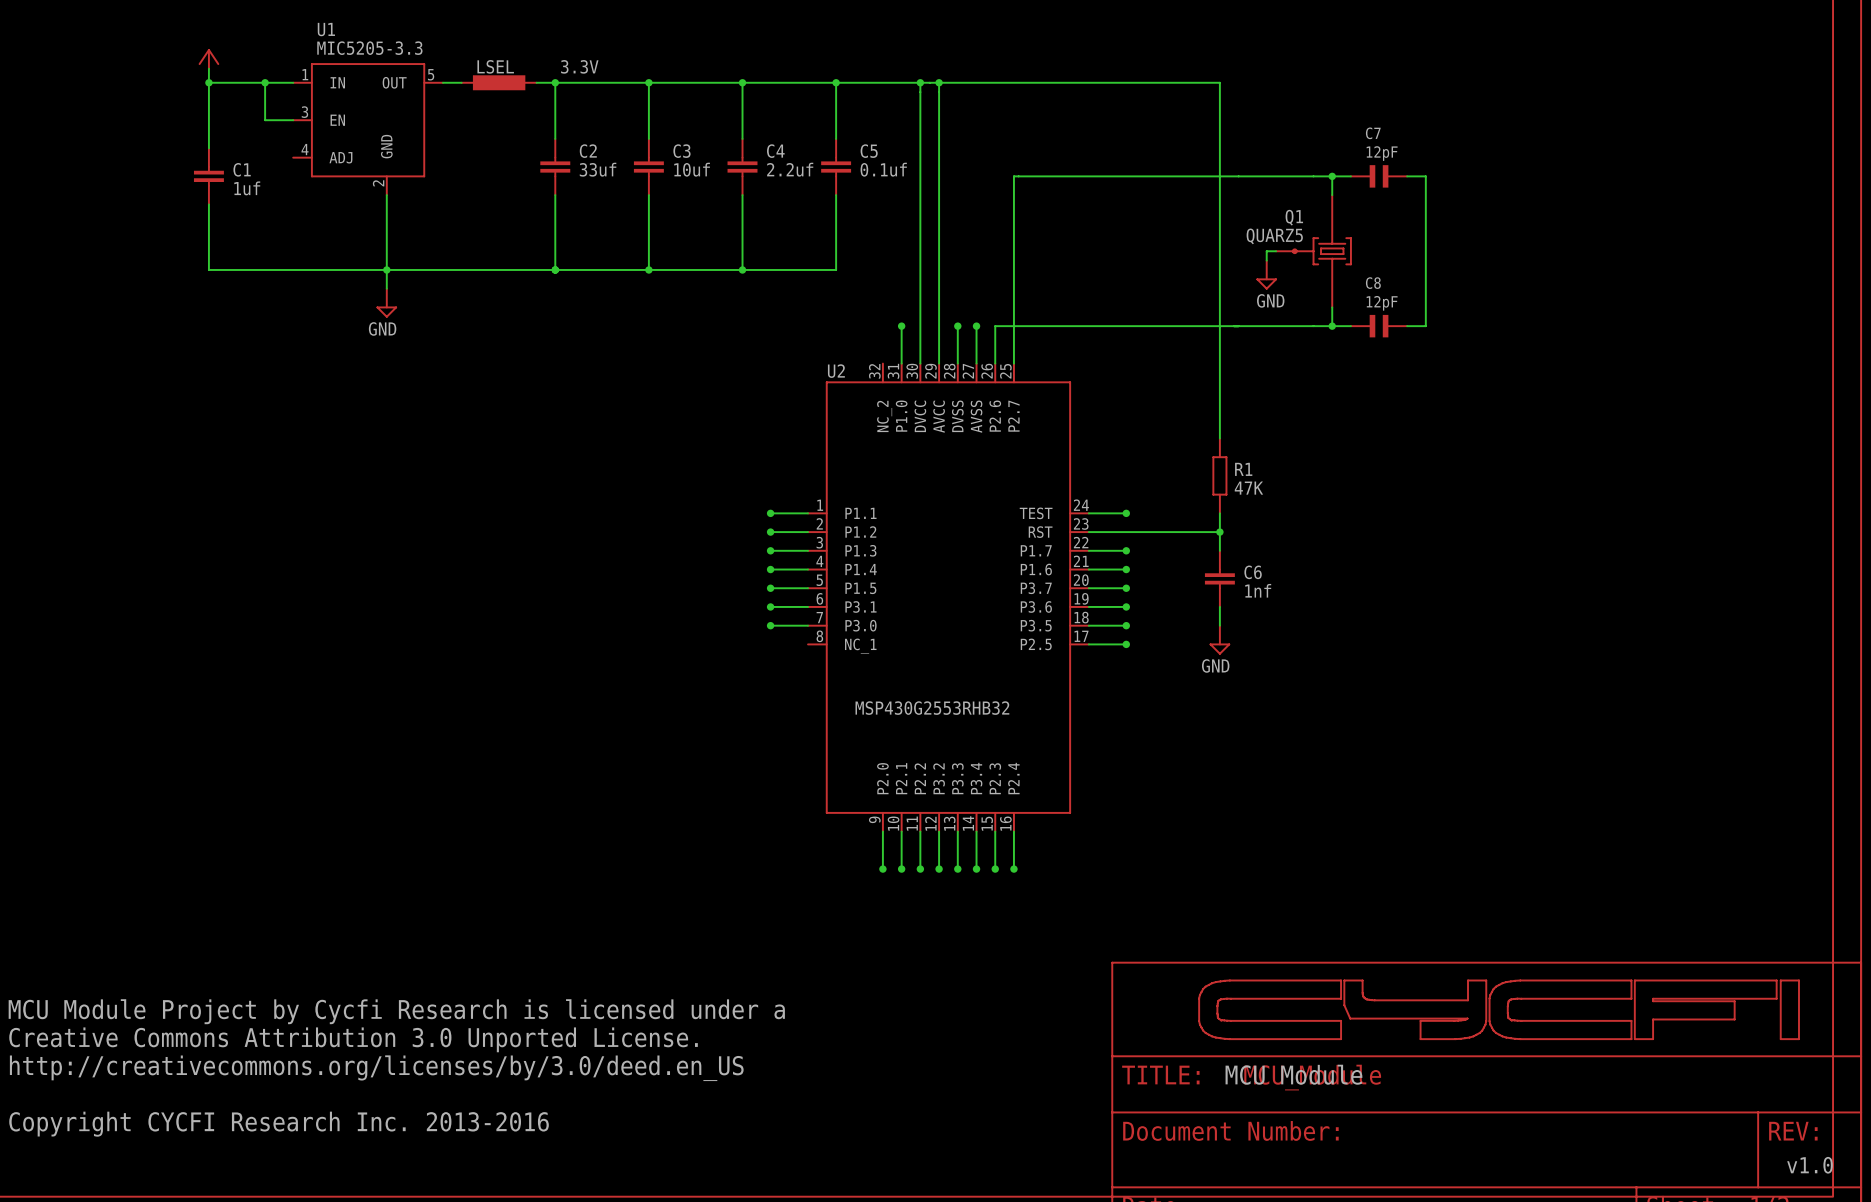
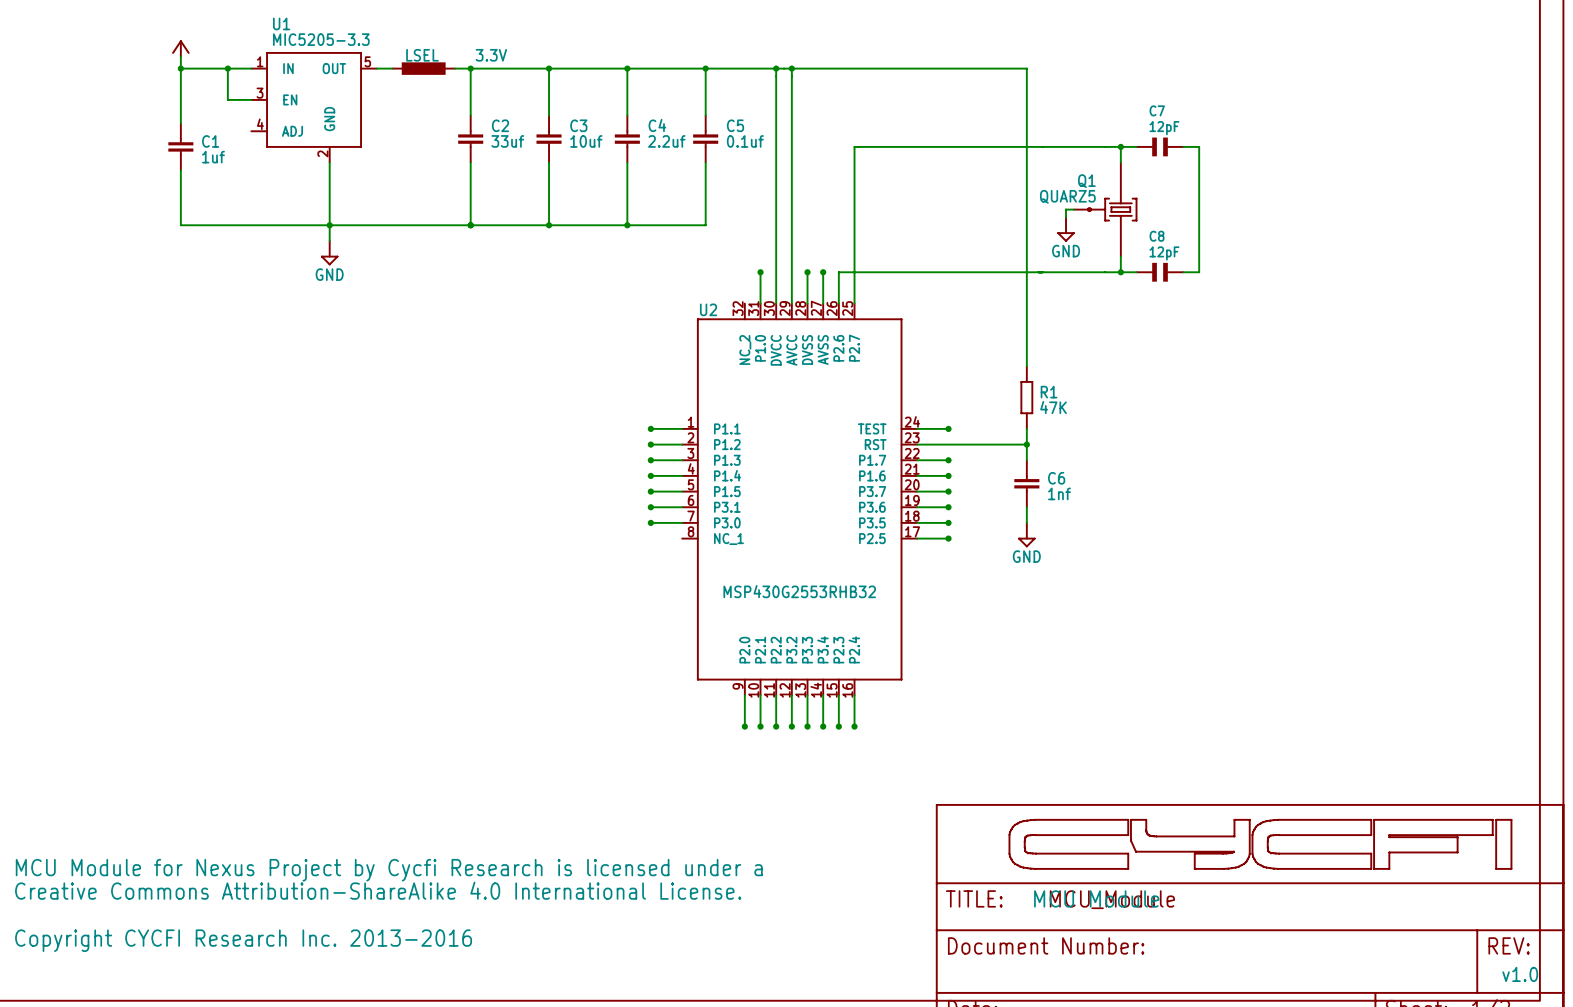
text: MCU Module Project by Cycfi Research is licensed under a (396, 1011) -> none
text: Creative Commons Attribution 3.0 Unported License. (353, 1039) -> MCU Module for Nexus Project by Cycfi Research is licensed under a (389, 870)
text: http://creativecommons.org/licenses/by/3.0/deed.en_US (376, 1068) -> Creative Commons Attribution-ShareAlike 4.0 International License. (378, 890)

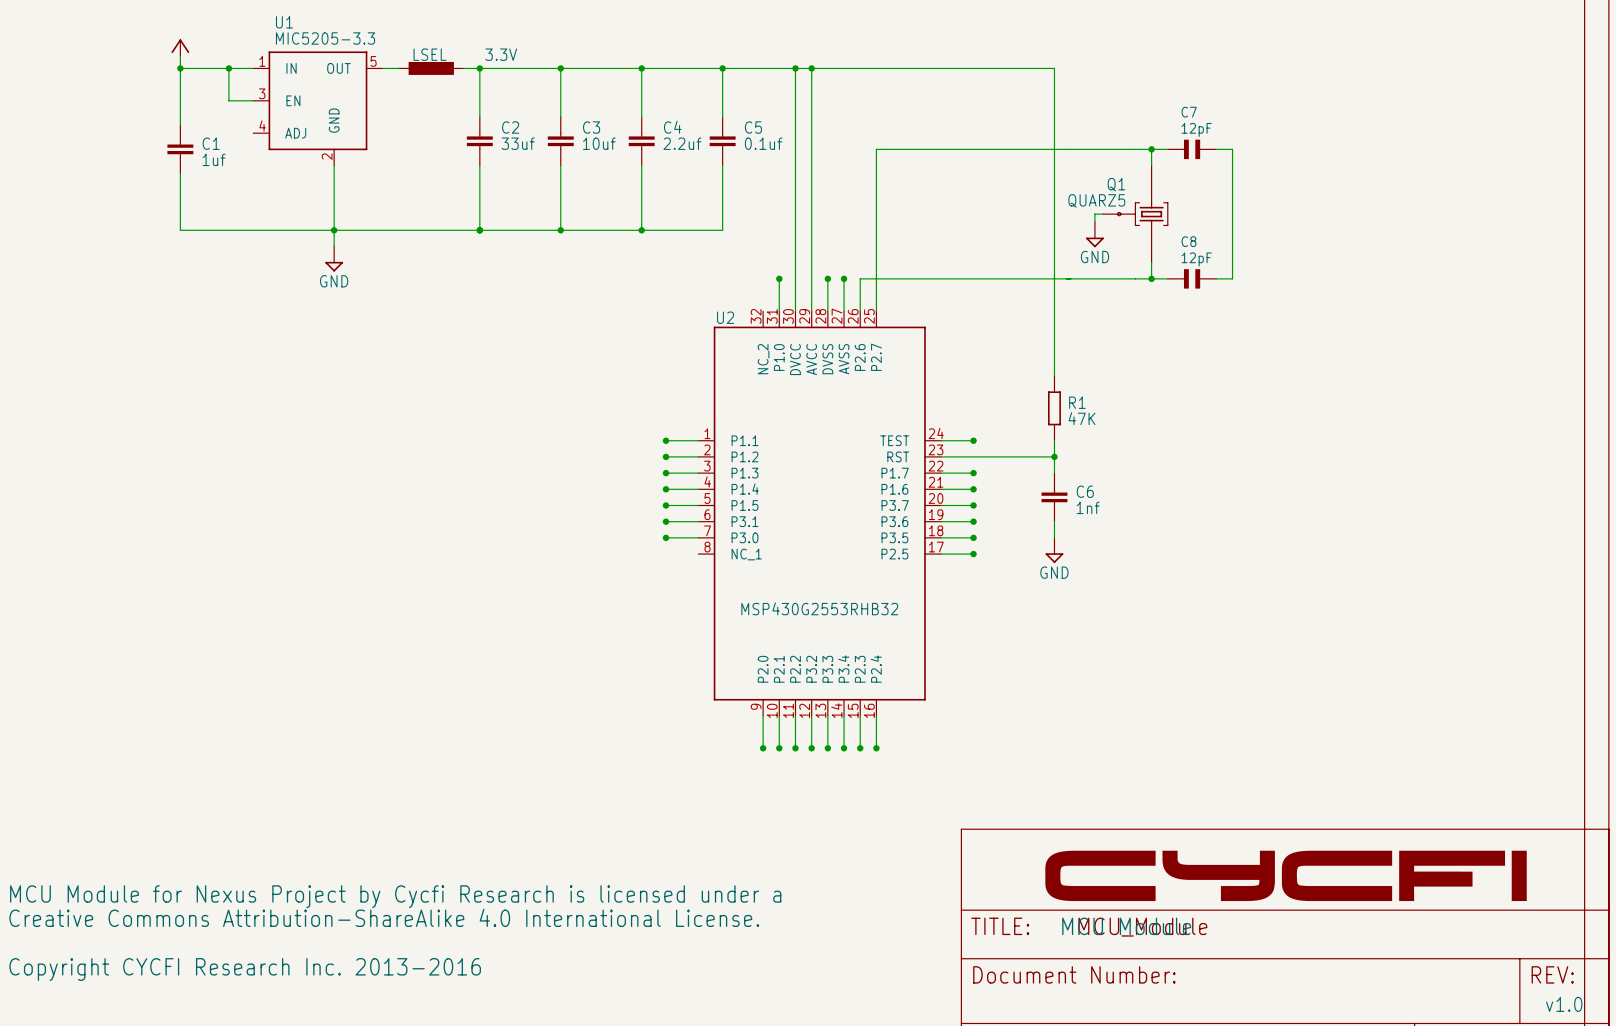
line: (1130, 819) (1146, 819) (1146, 833) (1156, 836) (1234, 836) (1234, 819) (1249, 819) (1249, 856) (1244, 863) (1235, 867) (1194, 868) (1194, 853) (1234, 851) (1135, 851) (1130, 840) (1130, 819) -> none
line: (1374, 819) (1492, 819) (1492, 835) (1389, 835) (1389, 837) (1457, 837) (1457, 852) (1389, 852) (1389, 868) (1374, 868) (1374, 819) -> none
line: (1496, 819) (1511, 819) (1511, 868) (1496, 868) (1496, 819) -> none
drawing: none -> [1045, 850, 1527, 902]
line: (1025, 849) (1025, 839) (1027, 835) (1128, 835) (1128, 819) (1030, 820) (1014, 824) (1009, 834) (1010, 856) (1014, 863) (1023, 867) (1128, 868) (1128, 853) (1027, 853) (1025, 849) -> none
line: (1268, 849) (1268, 839) (1270, 835) (1371, 835) (1371, 819) (1273, 820) (1257, 824) (1252, 834) (1253, 856) (1257, 863) (1266, 867) (1371, 868) (1371, 853) (1270, 853) (1268, 849) -> none

